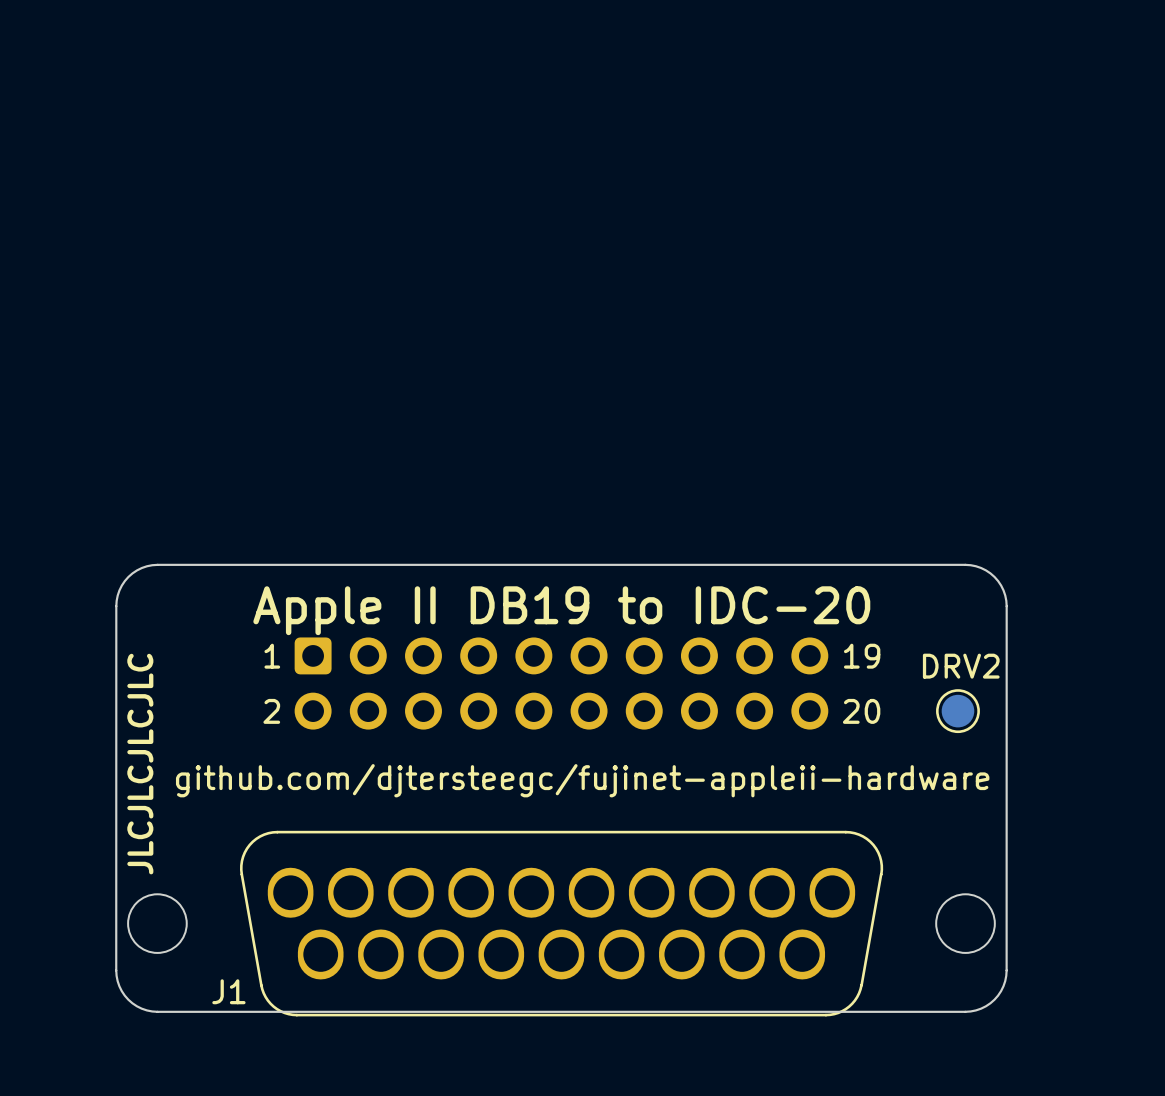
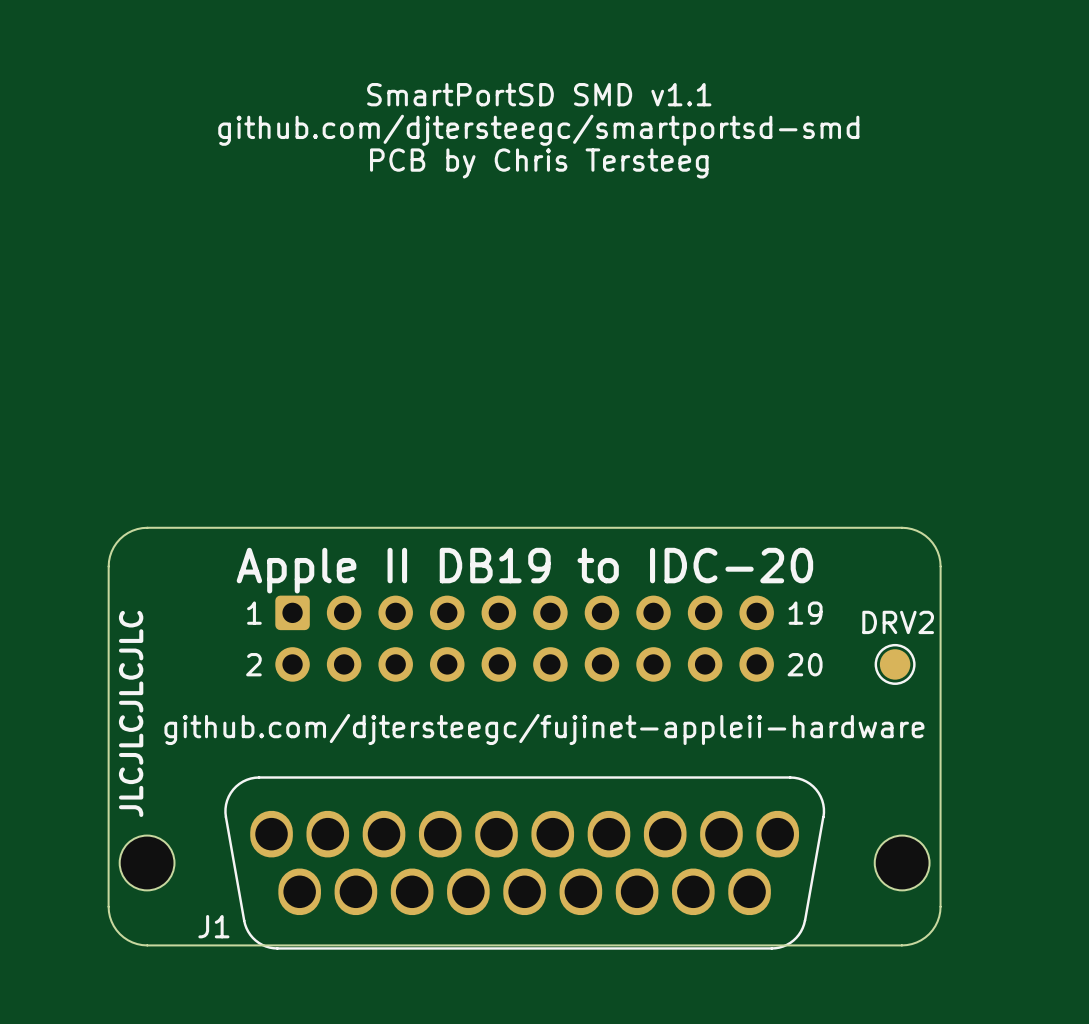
text: none -> SmartPortSD SMD v1.1 (539, 94)
text: none -> github.com/djtersteegc/smartportsd-smd (538, 130)
text: none -> PCB by Chris Tersteeg (539, 163)

